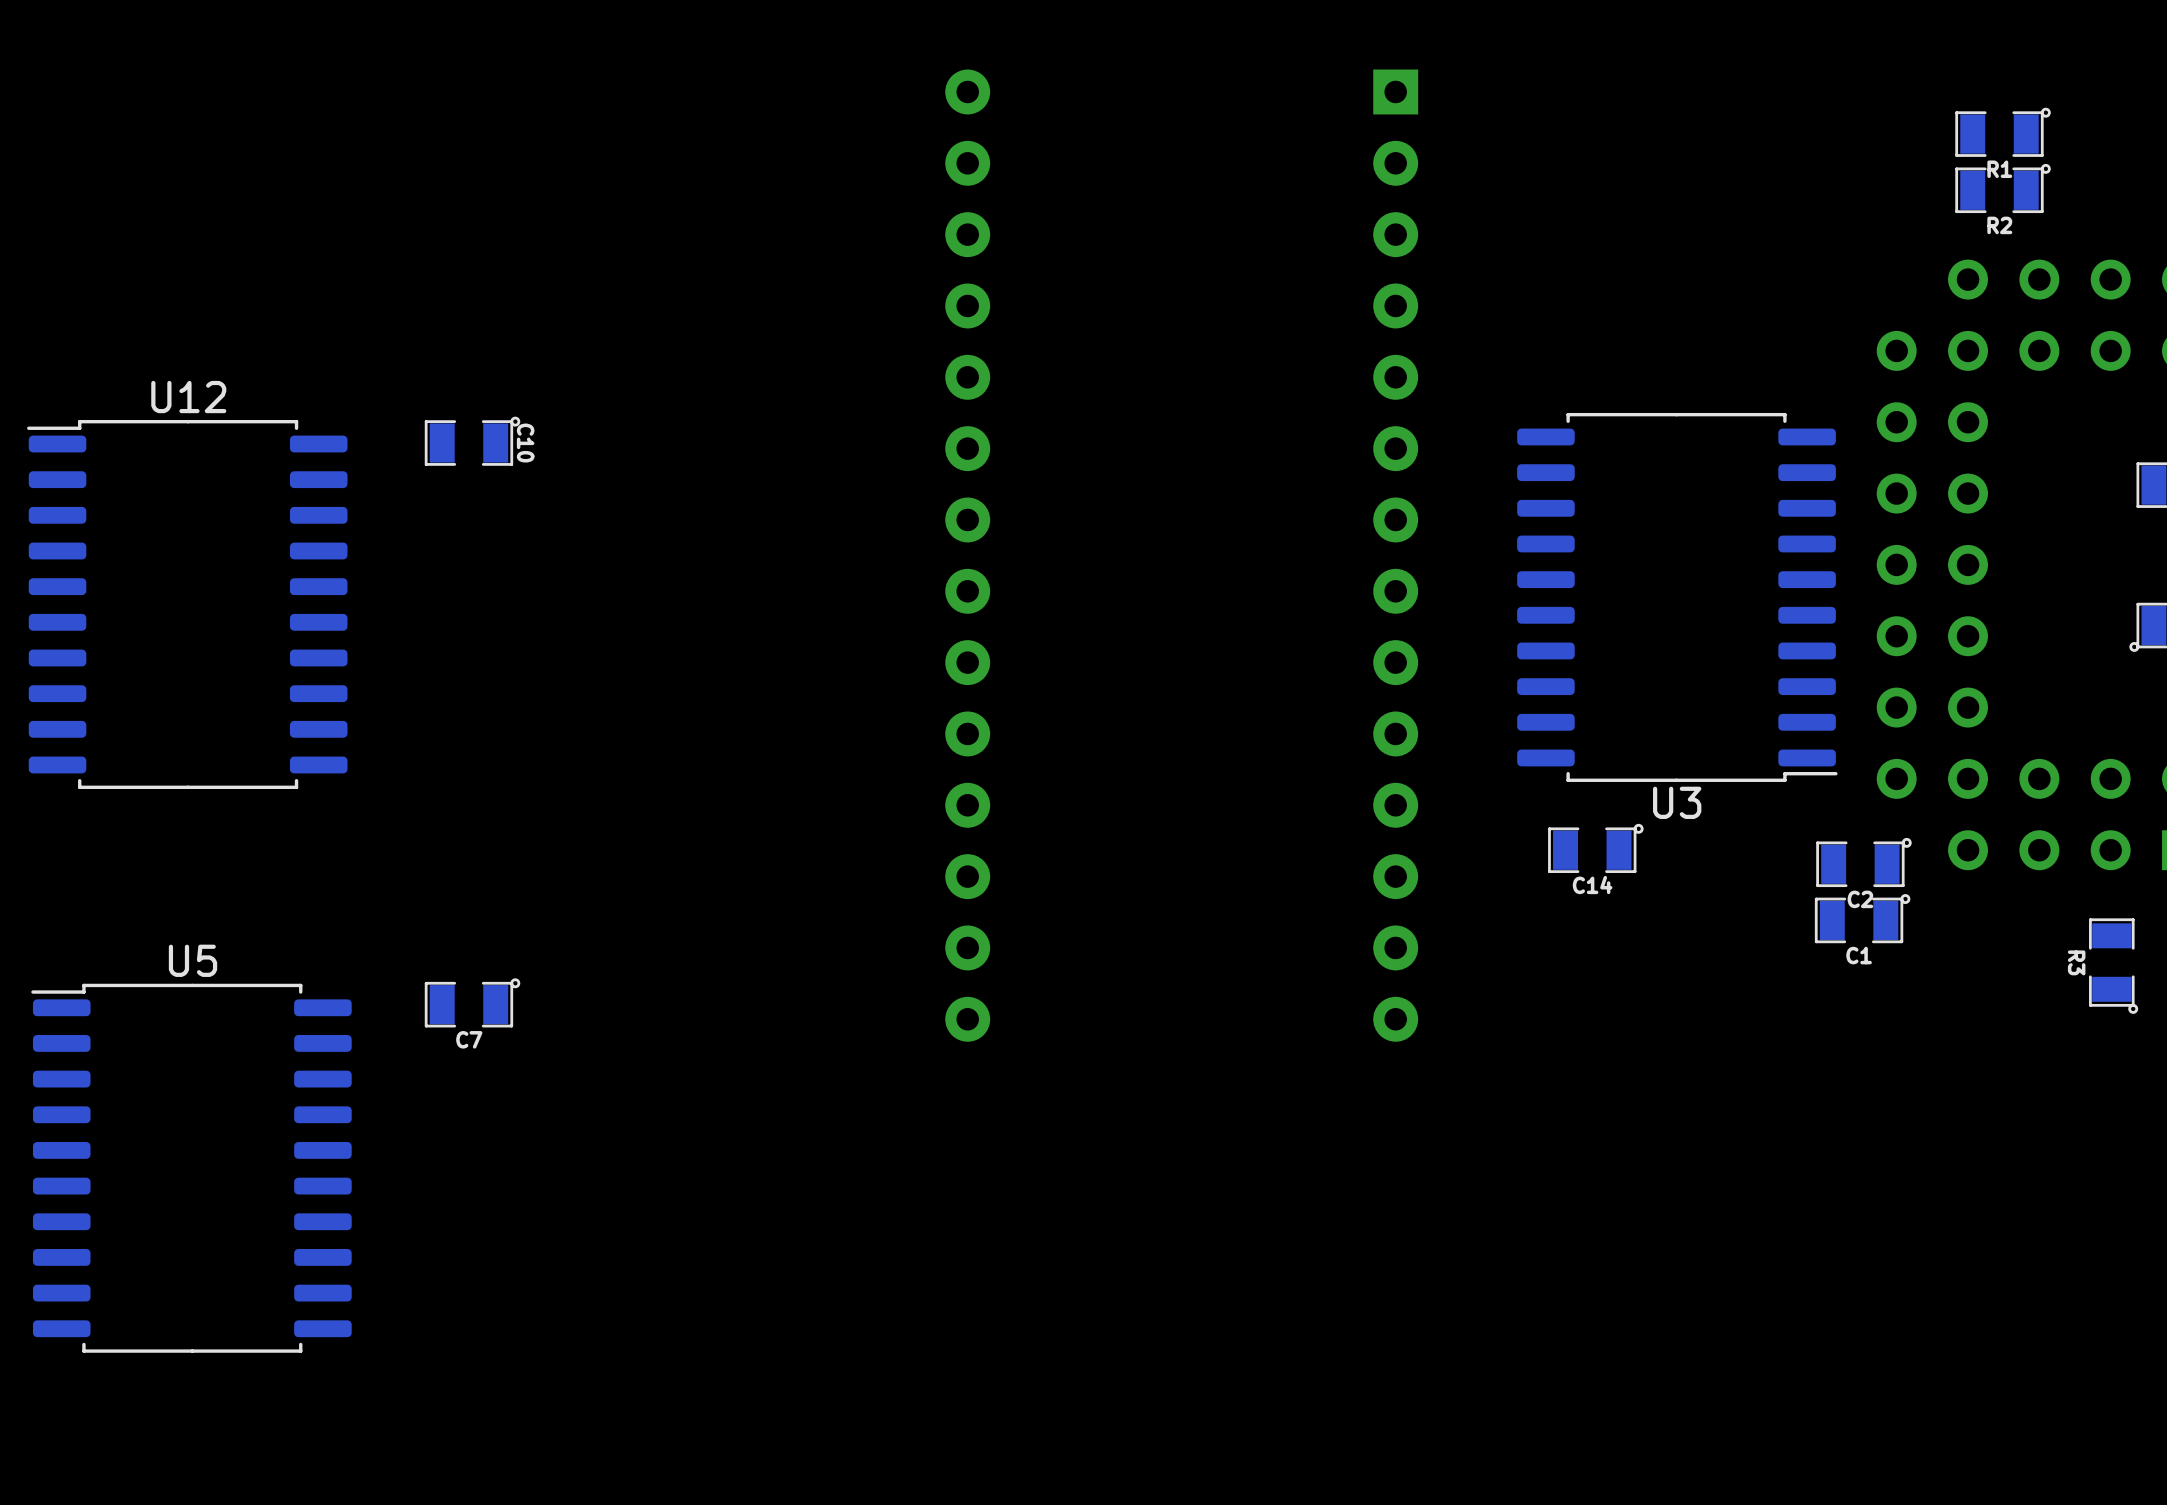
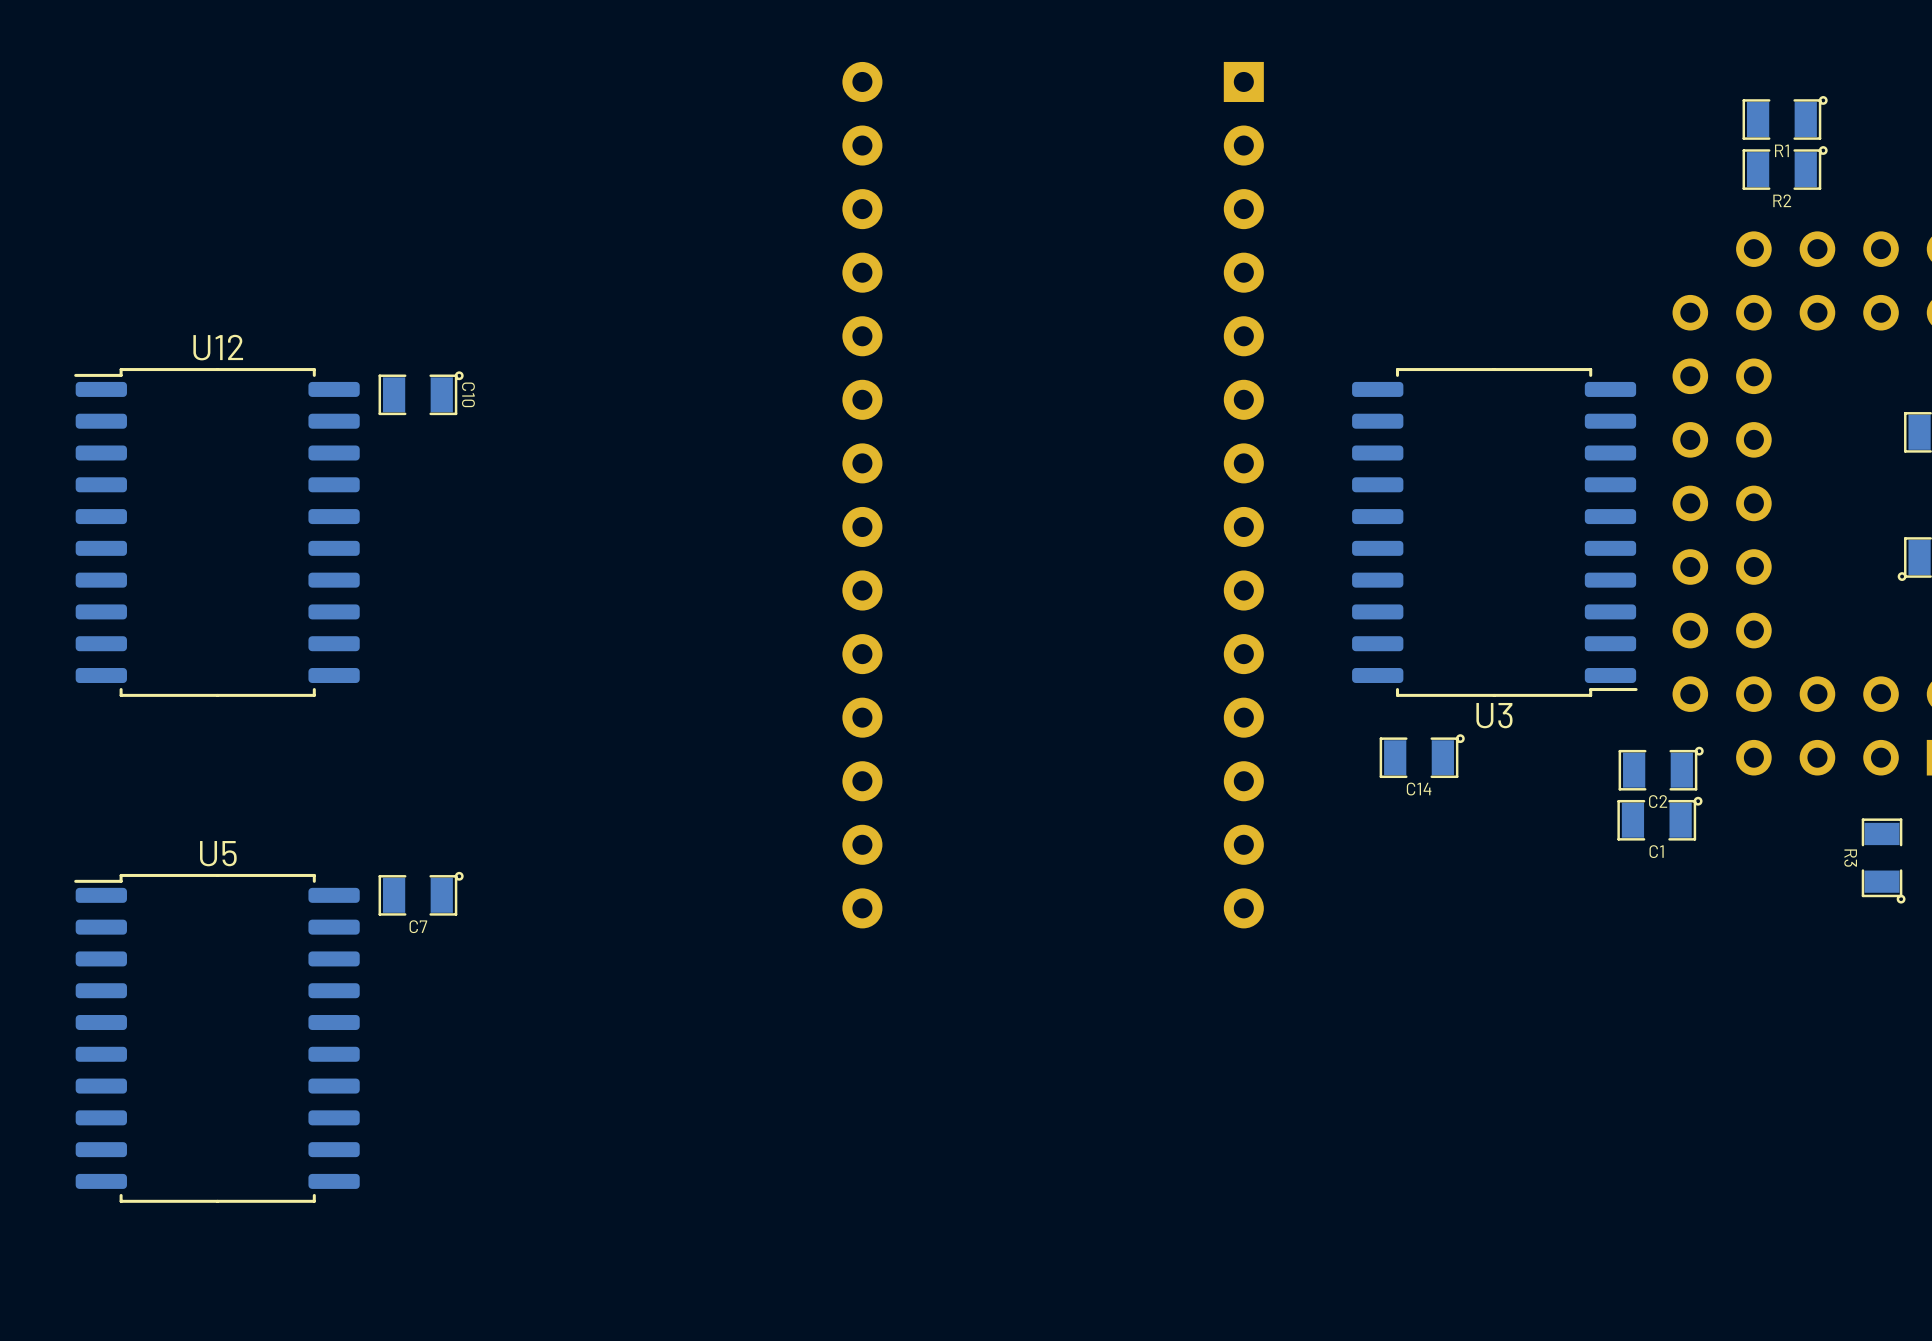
U12 position: (187, 604) -> (216, 532)
U5 position: (191, 1168) -> (216, 1038)

